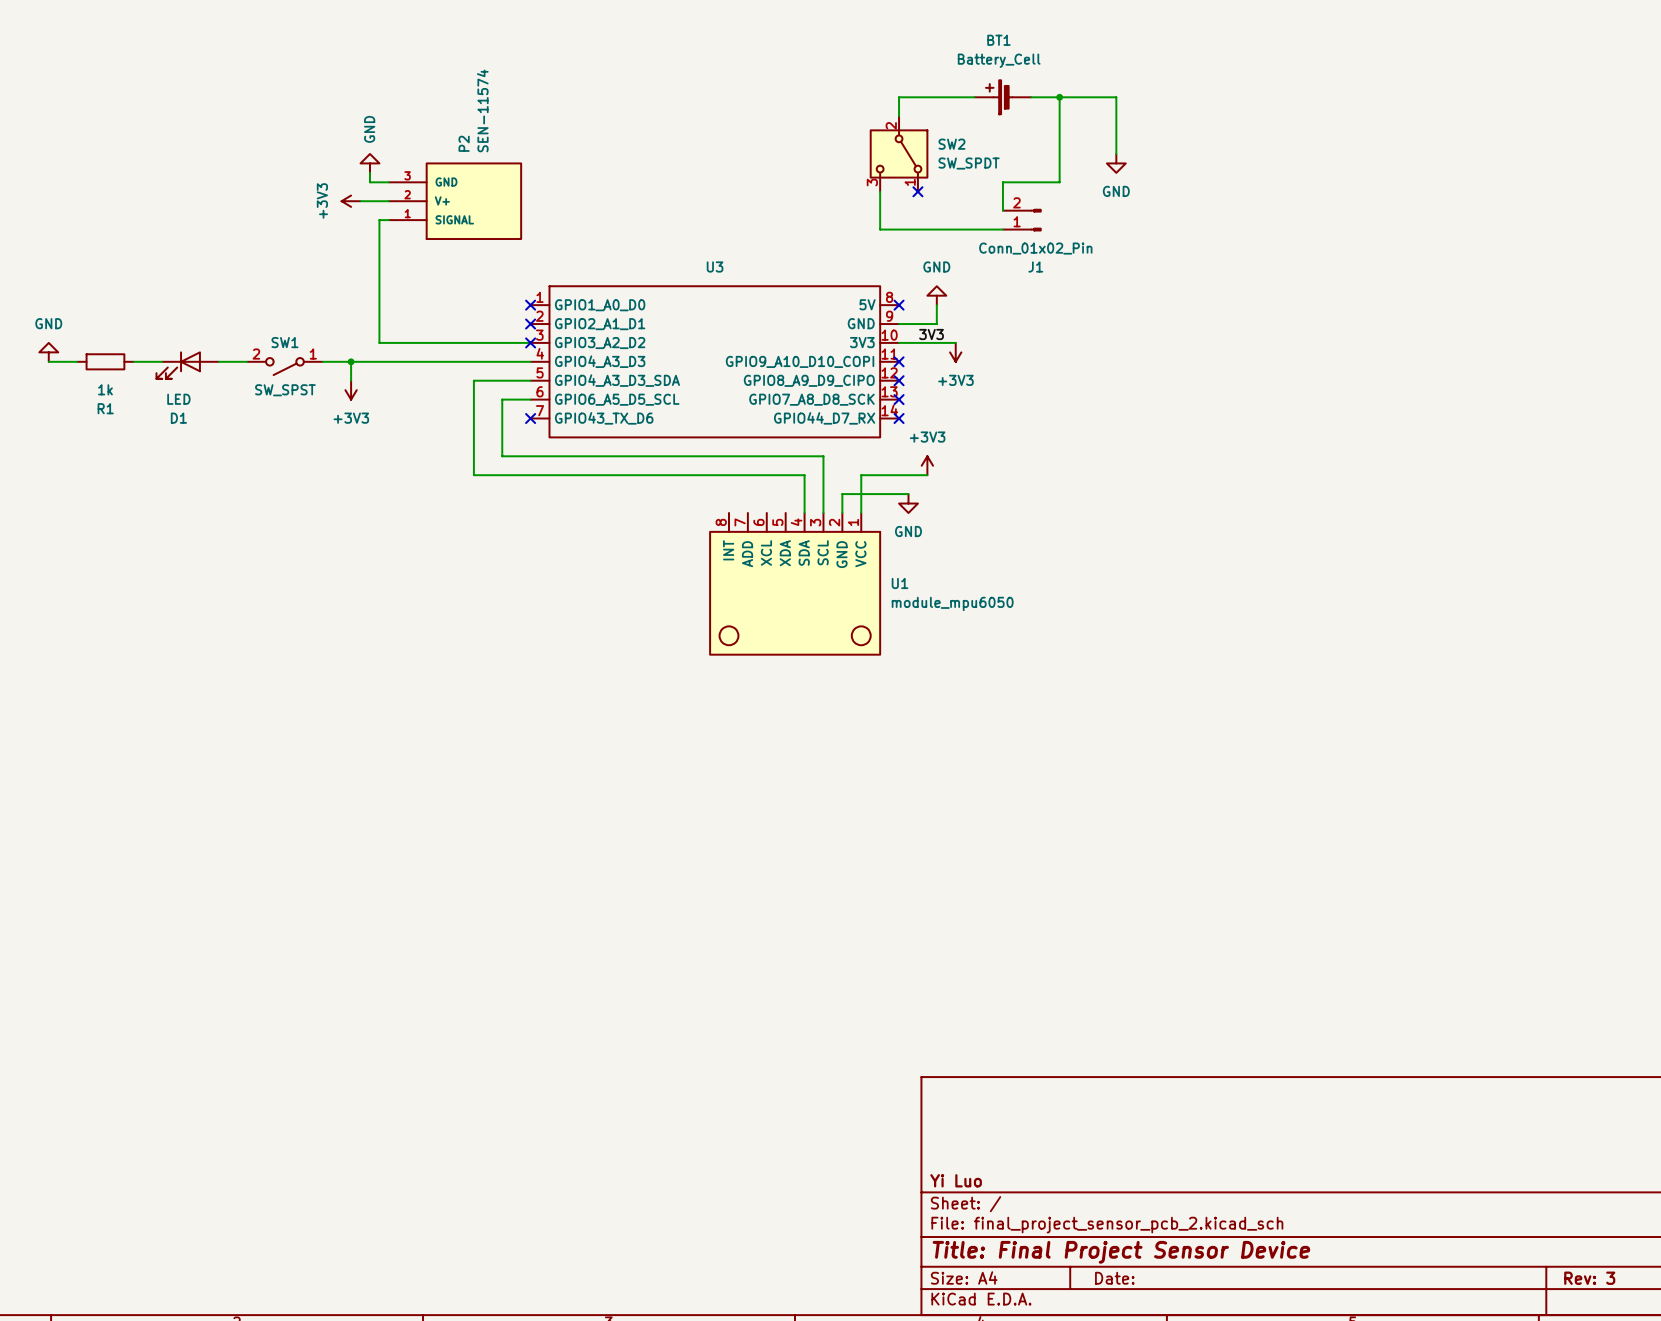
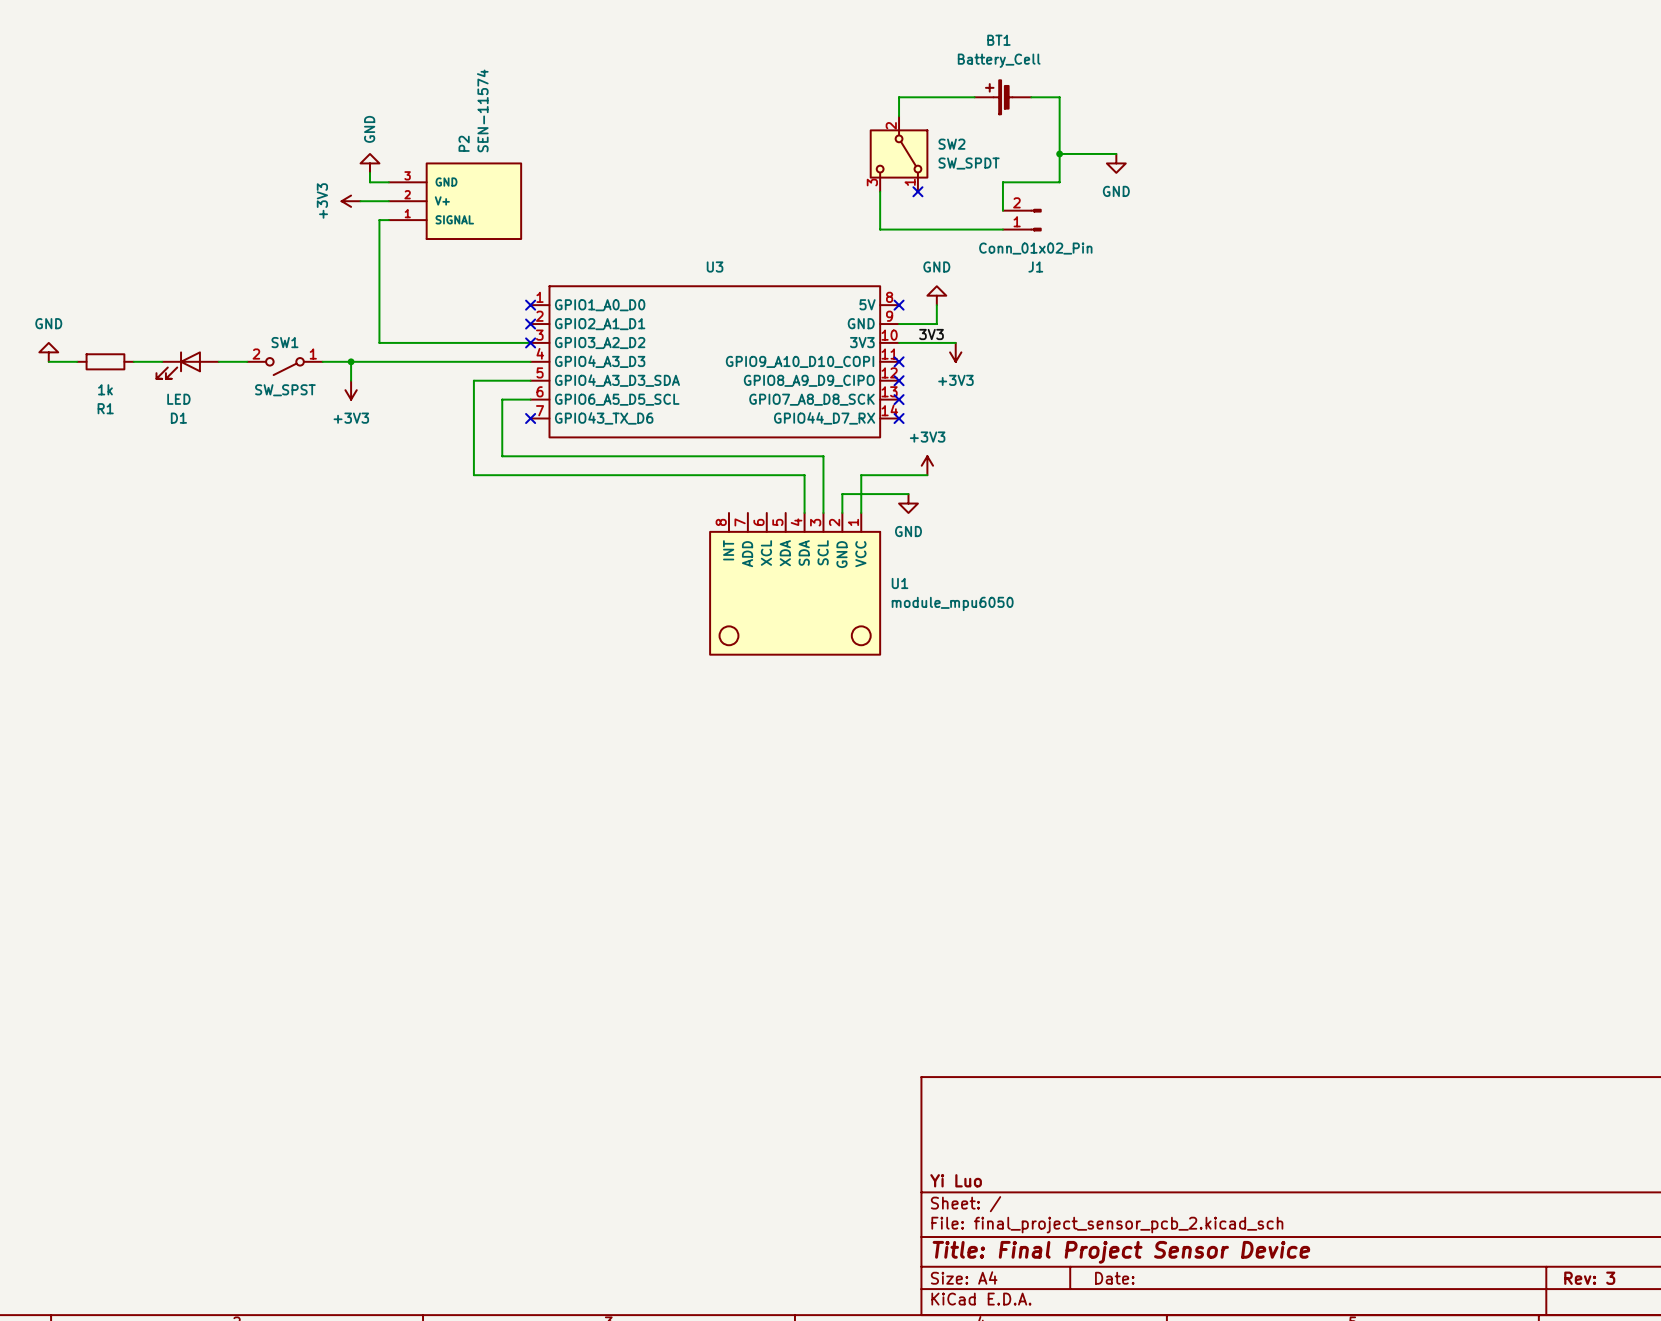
wire: (1059, 97) (1116, 97) (1116, 153) -> (1059, 153) (1116, 153)
junction: (1059, 97) -> none
junction: none -> (1059, 153)

